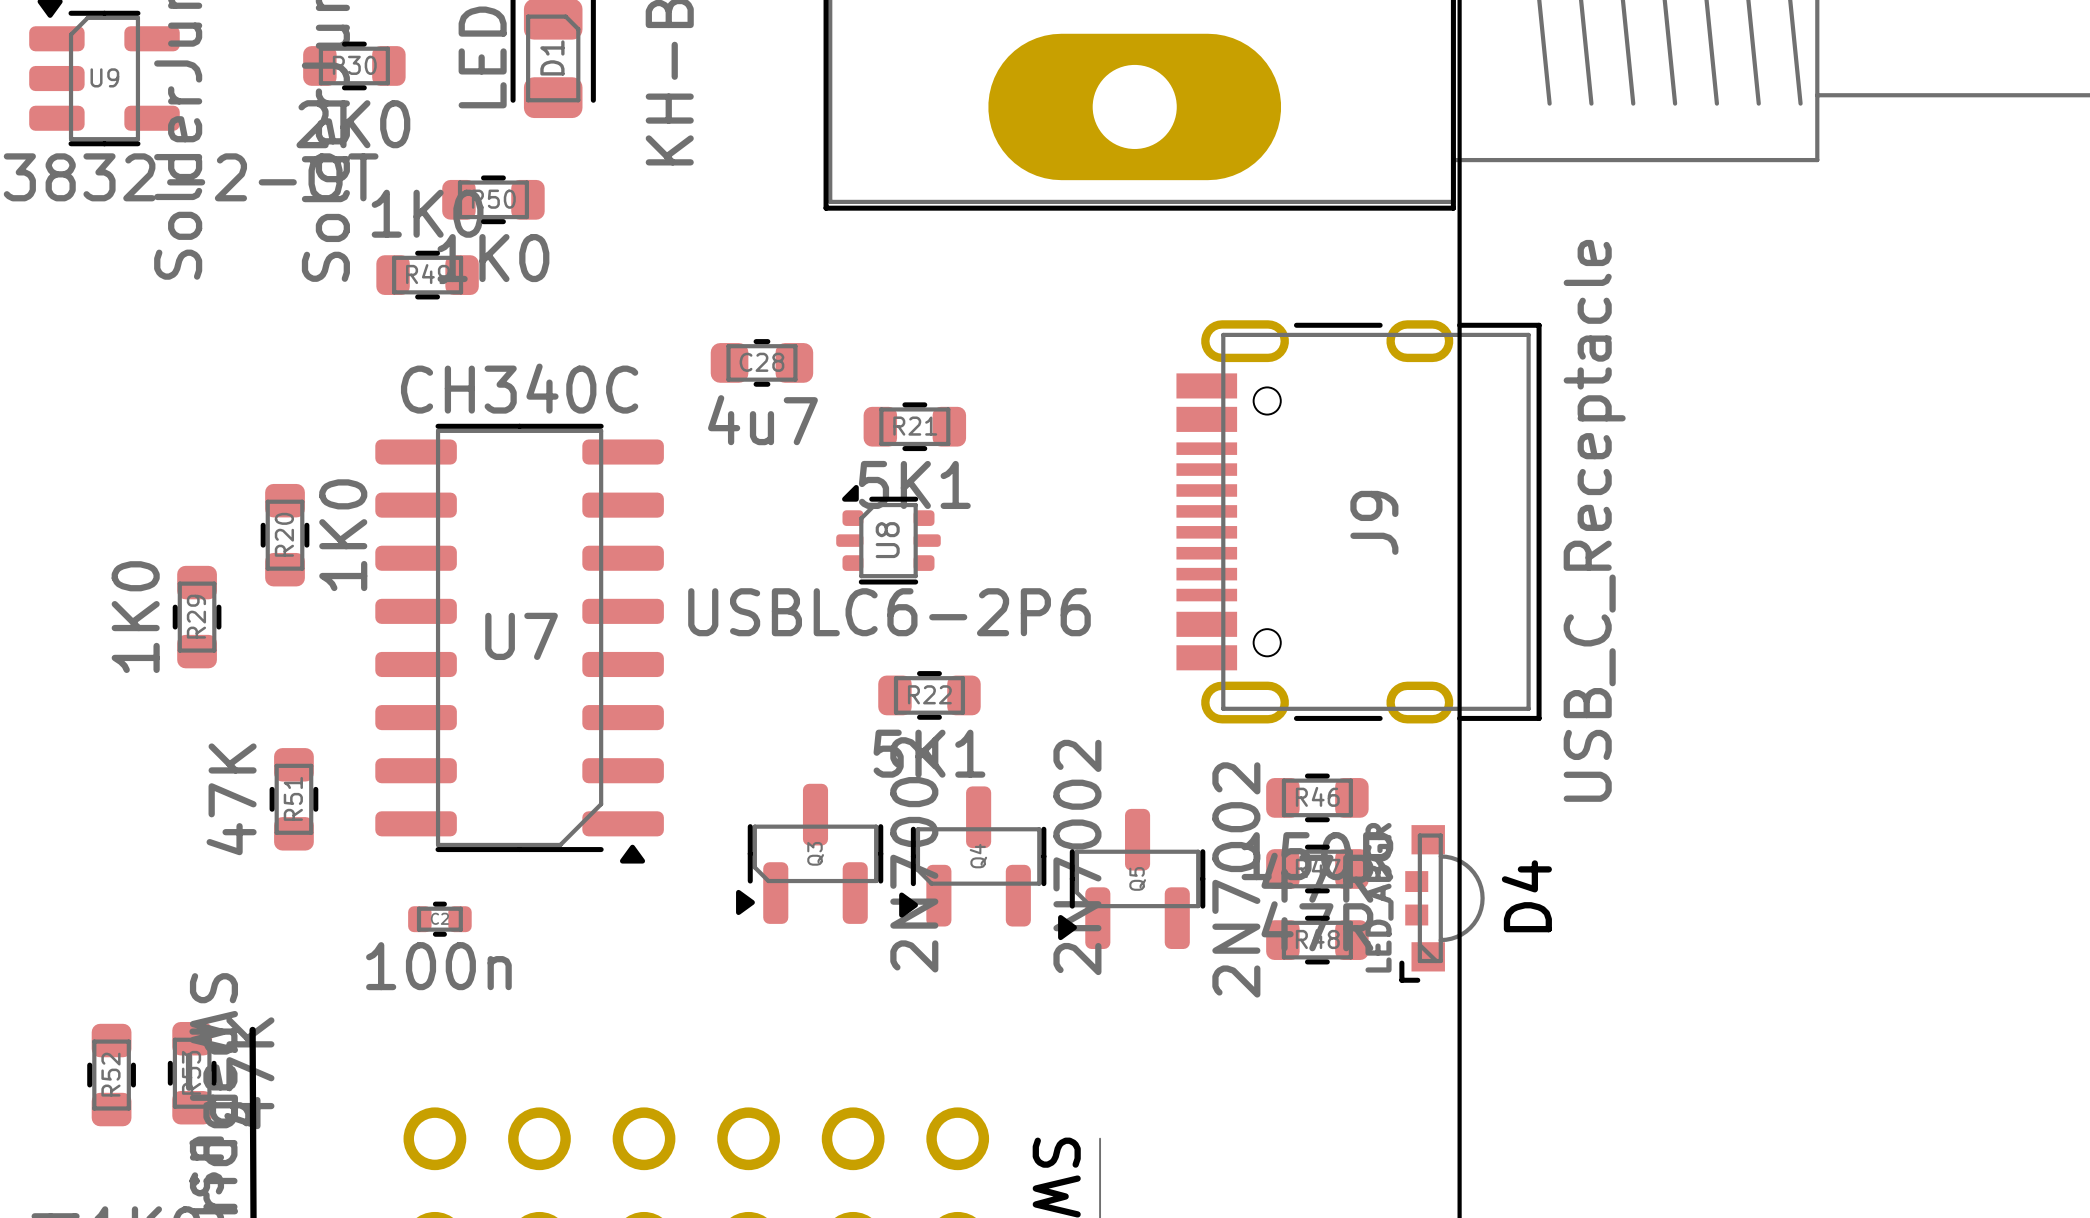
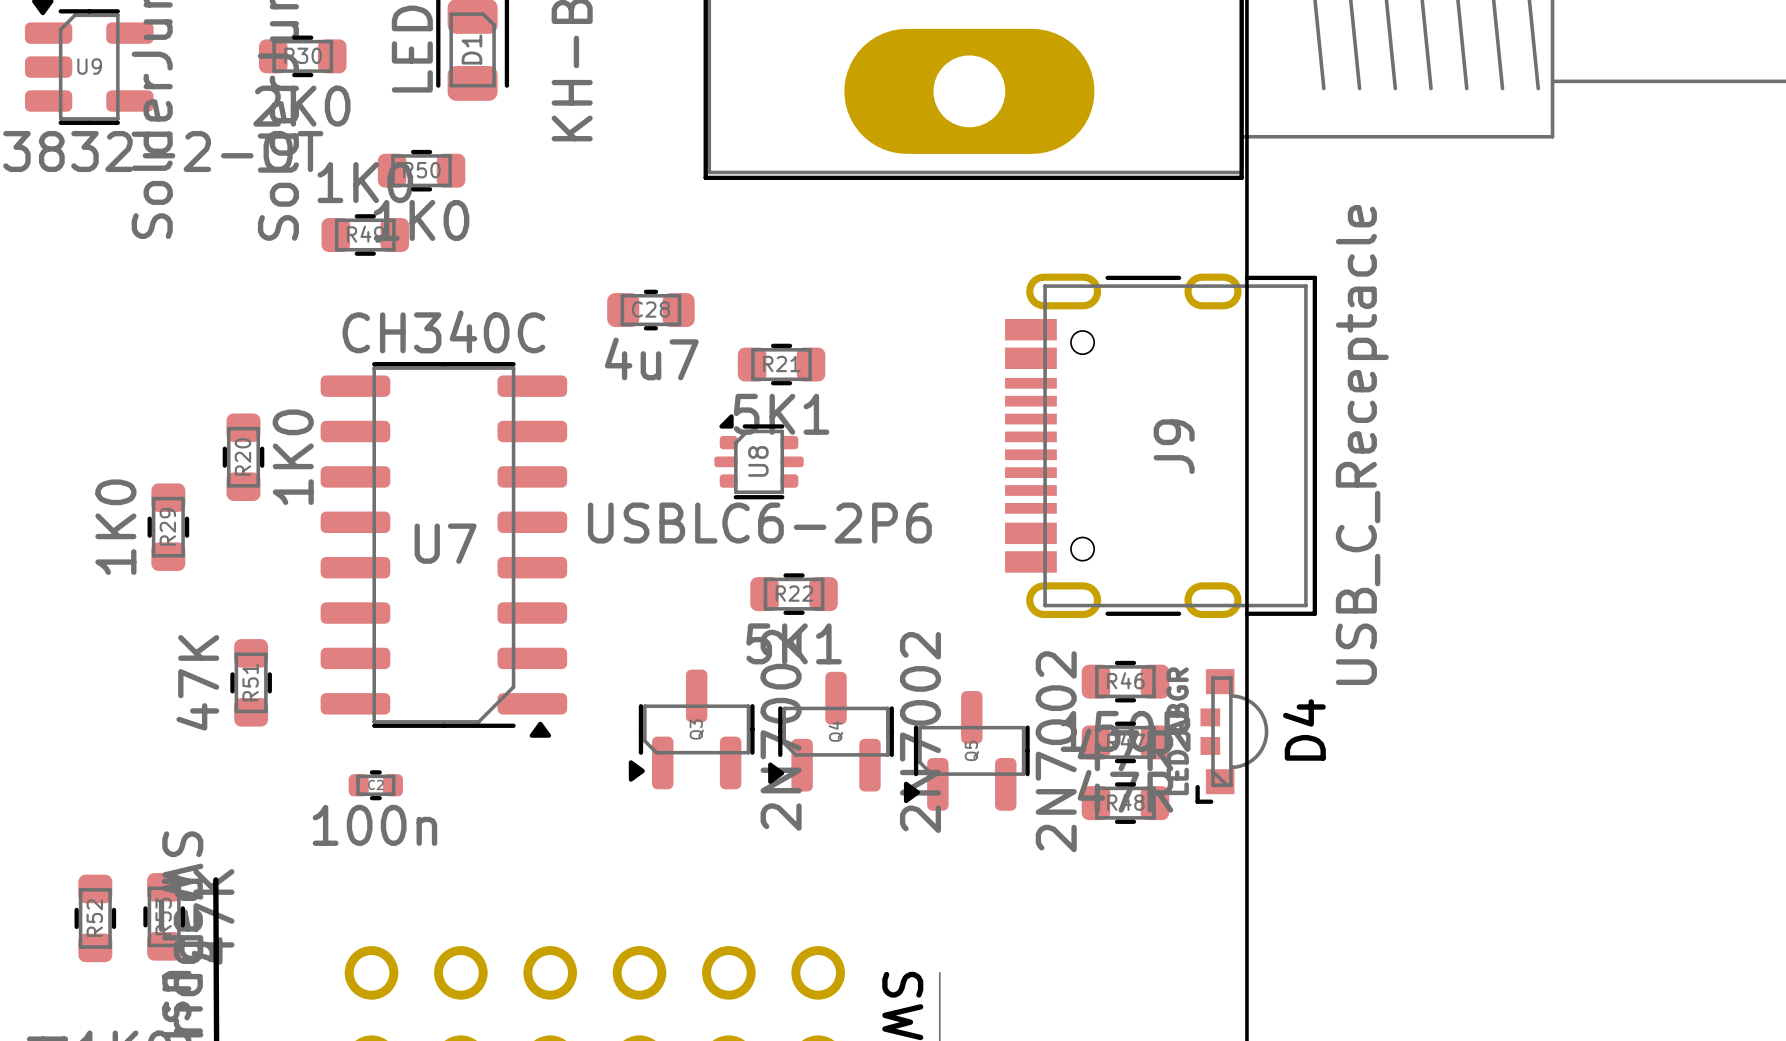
D4 position: (1442, 903) -> (1231, 736)

